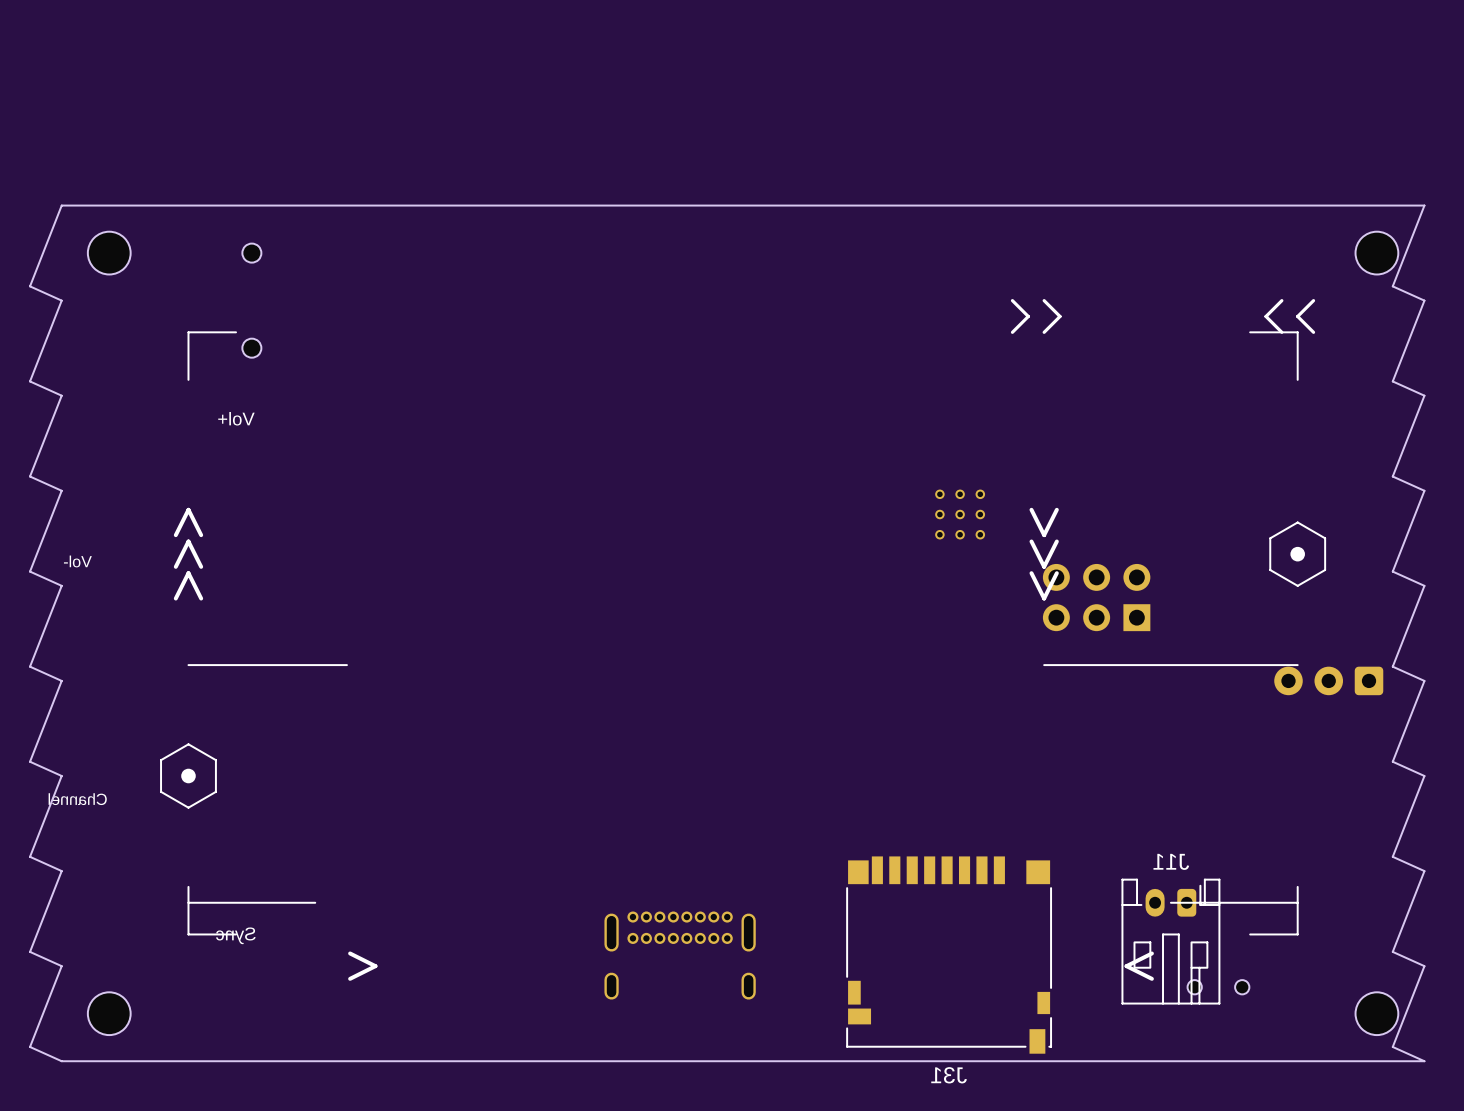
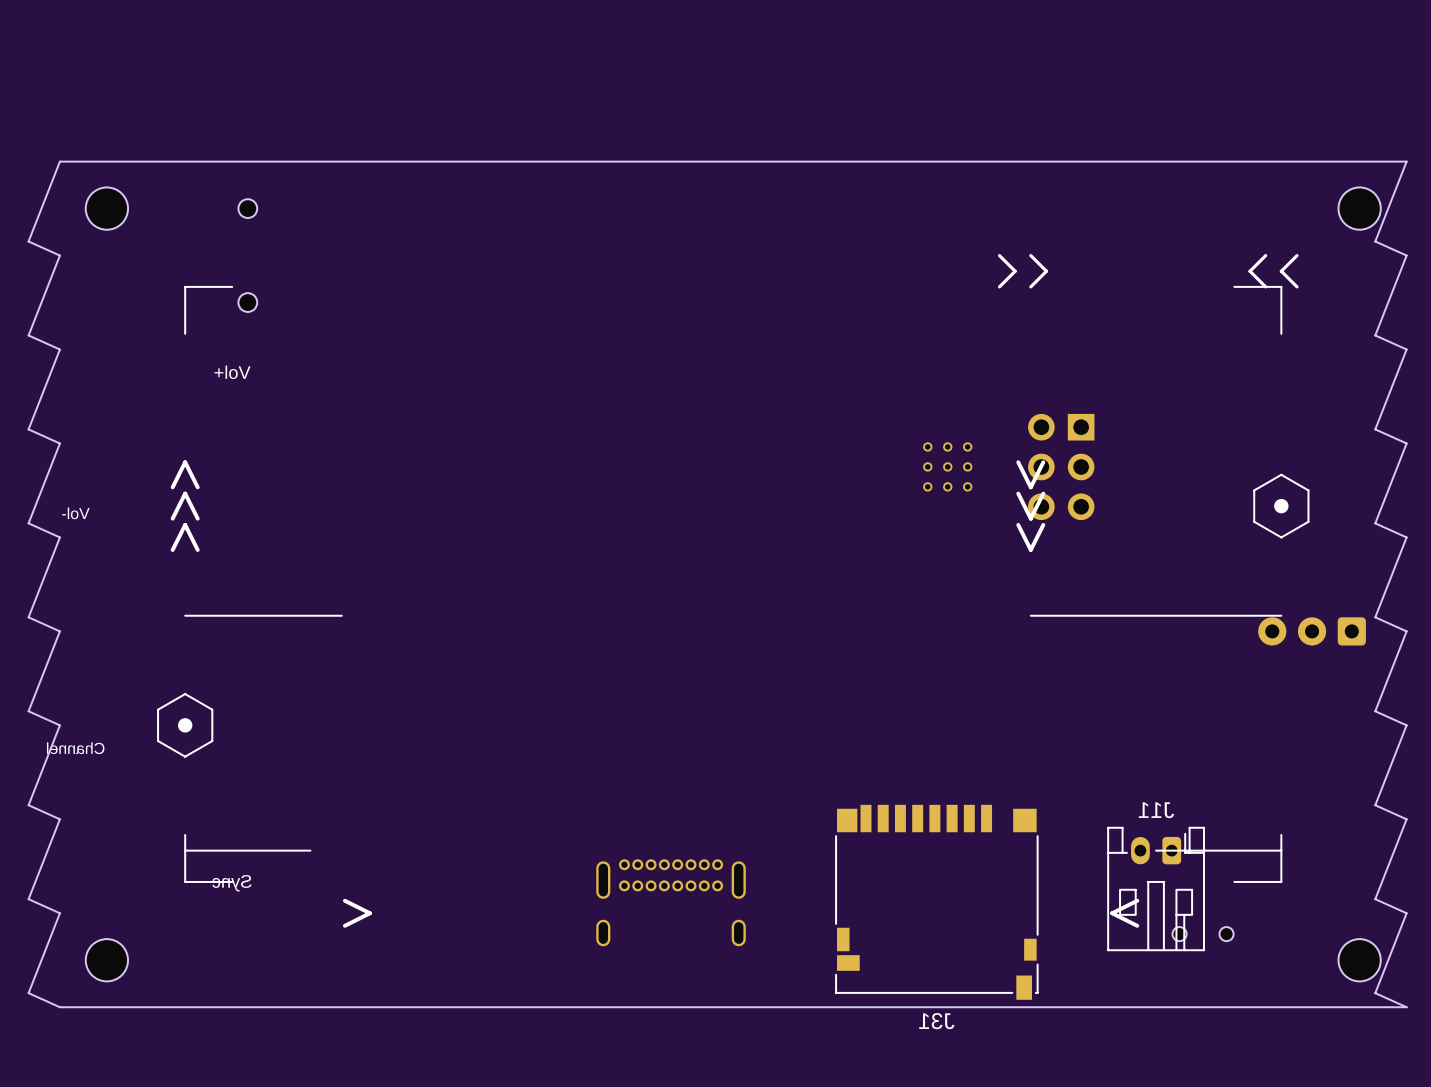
part rotation: 0° (1096, 597) -> 90° counterclockwise (1061, 466)
part position: (1096, 597) -> (1061, 466)

